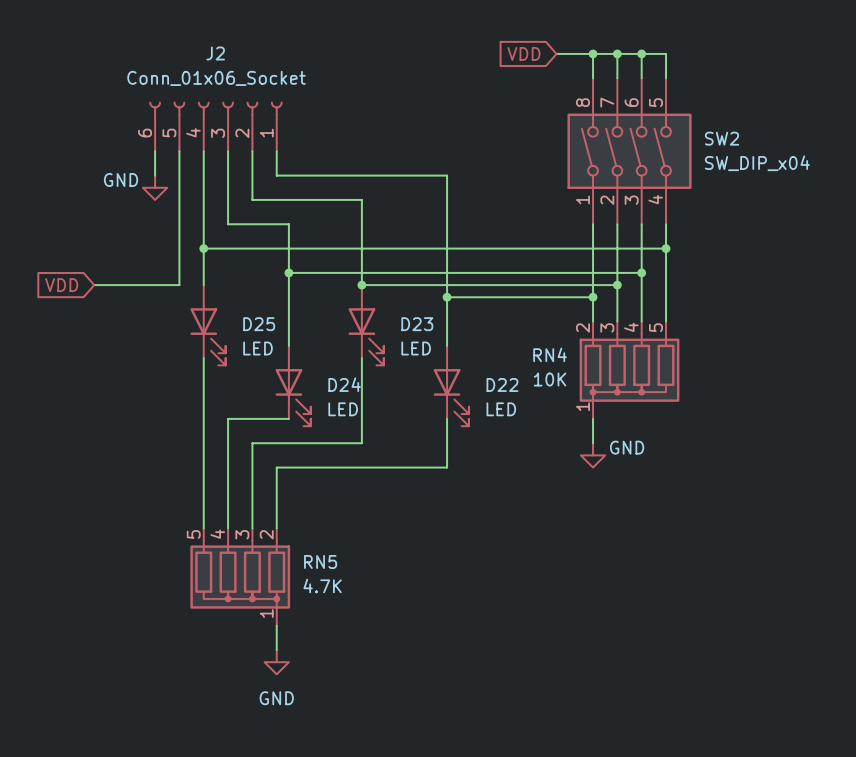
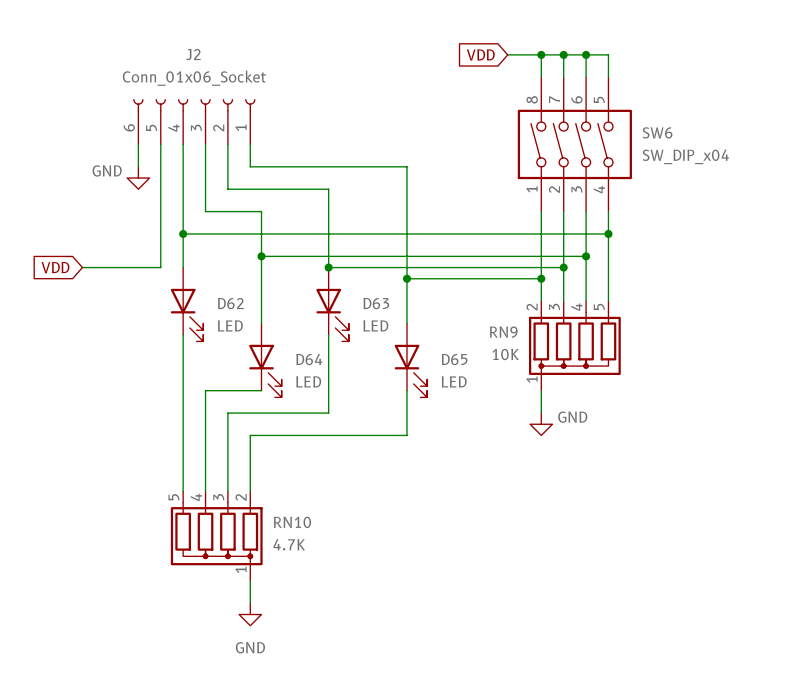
SW2 name: SW2 (722, 138) -> SW6 (657, 132)
D25 name: D25 (259, 324) -> D62 (230, 303)
D23 name: D23 (417, 324) -> D63 (376, 303)
RN4 name: RN4 (550, 354) -> RN9 (503, 332)
D24 name: D24 (344, 384) -> D64 (309, 359)
D22 name: D22 (502, 384) -> D65 (454, 359)
RN5 name: RN5 (320, 561) -> RN10 (292, 522)

